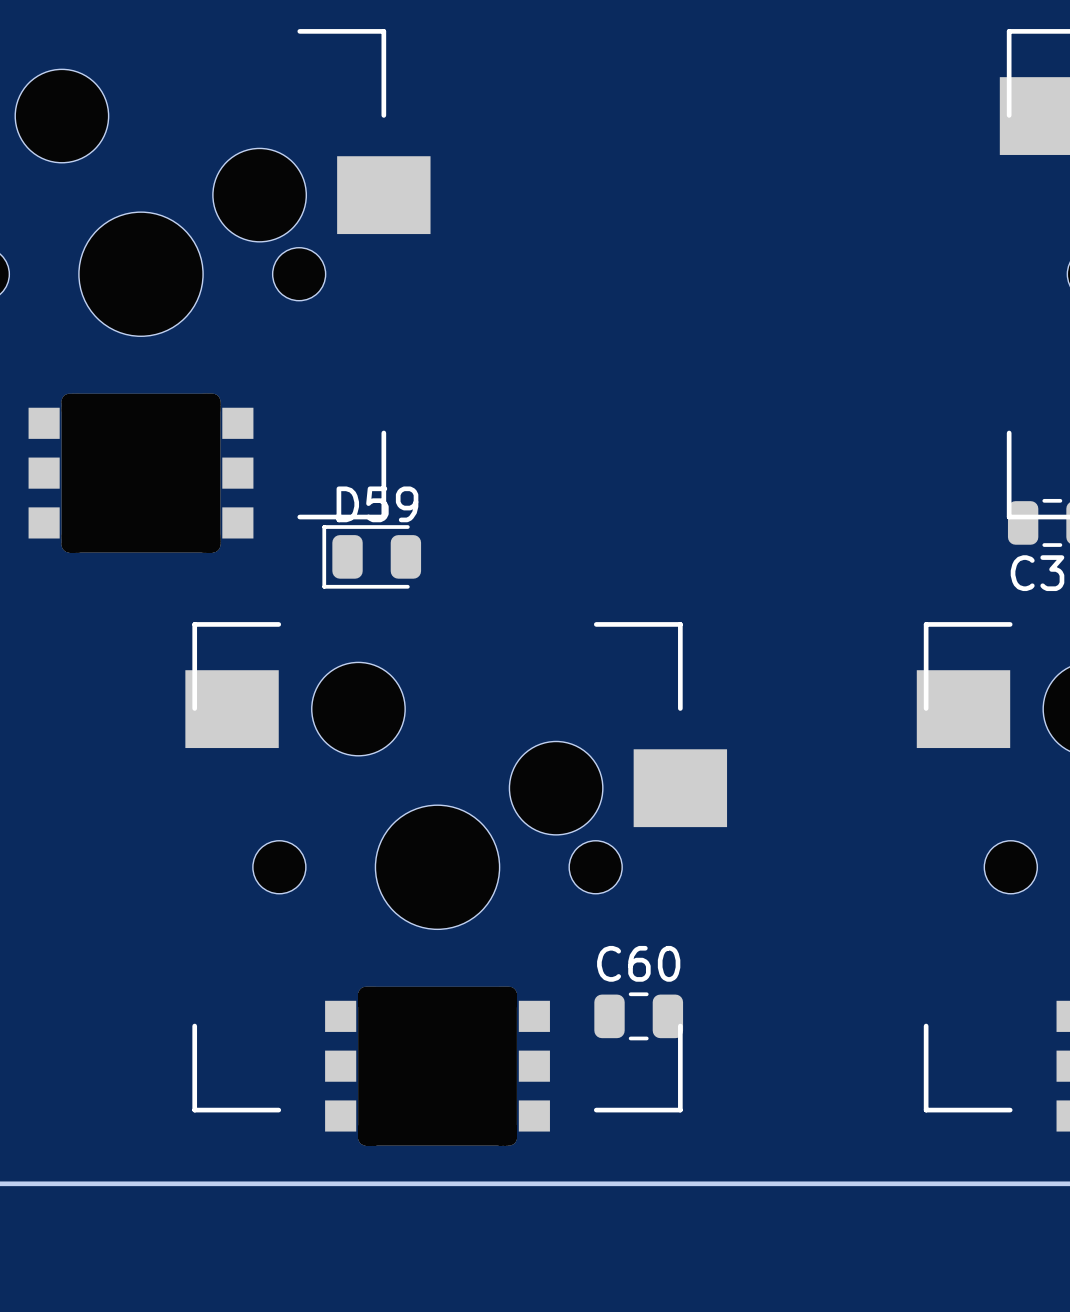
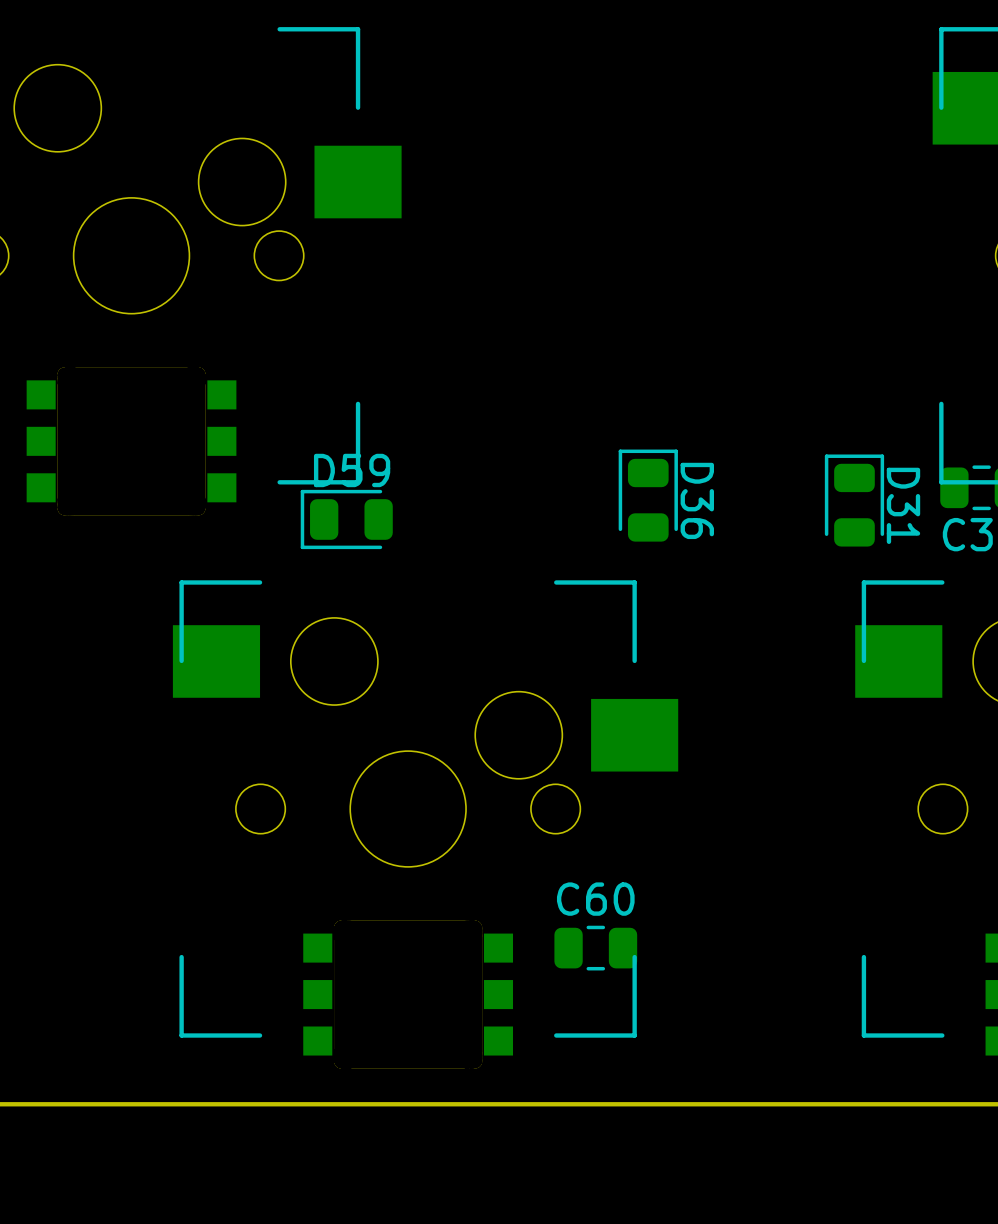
D36: none -> (648, 495)
D31: none -> (854, 500)

